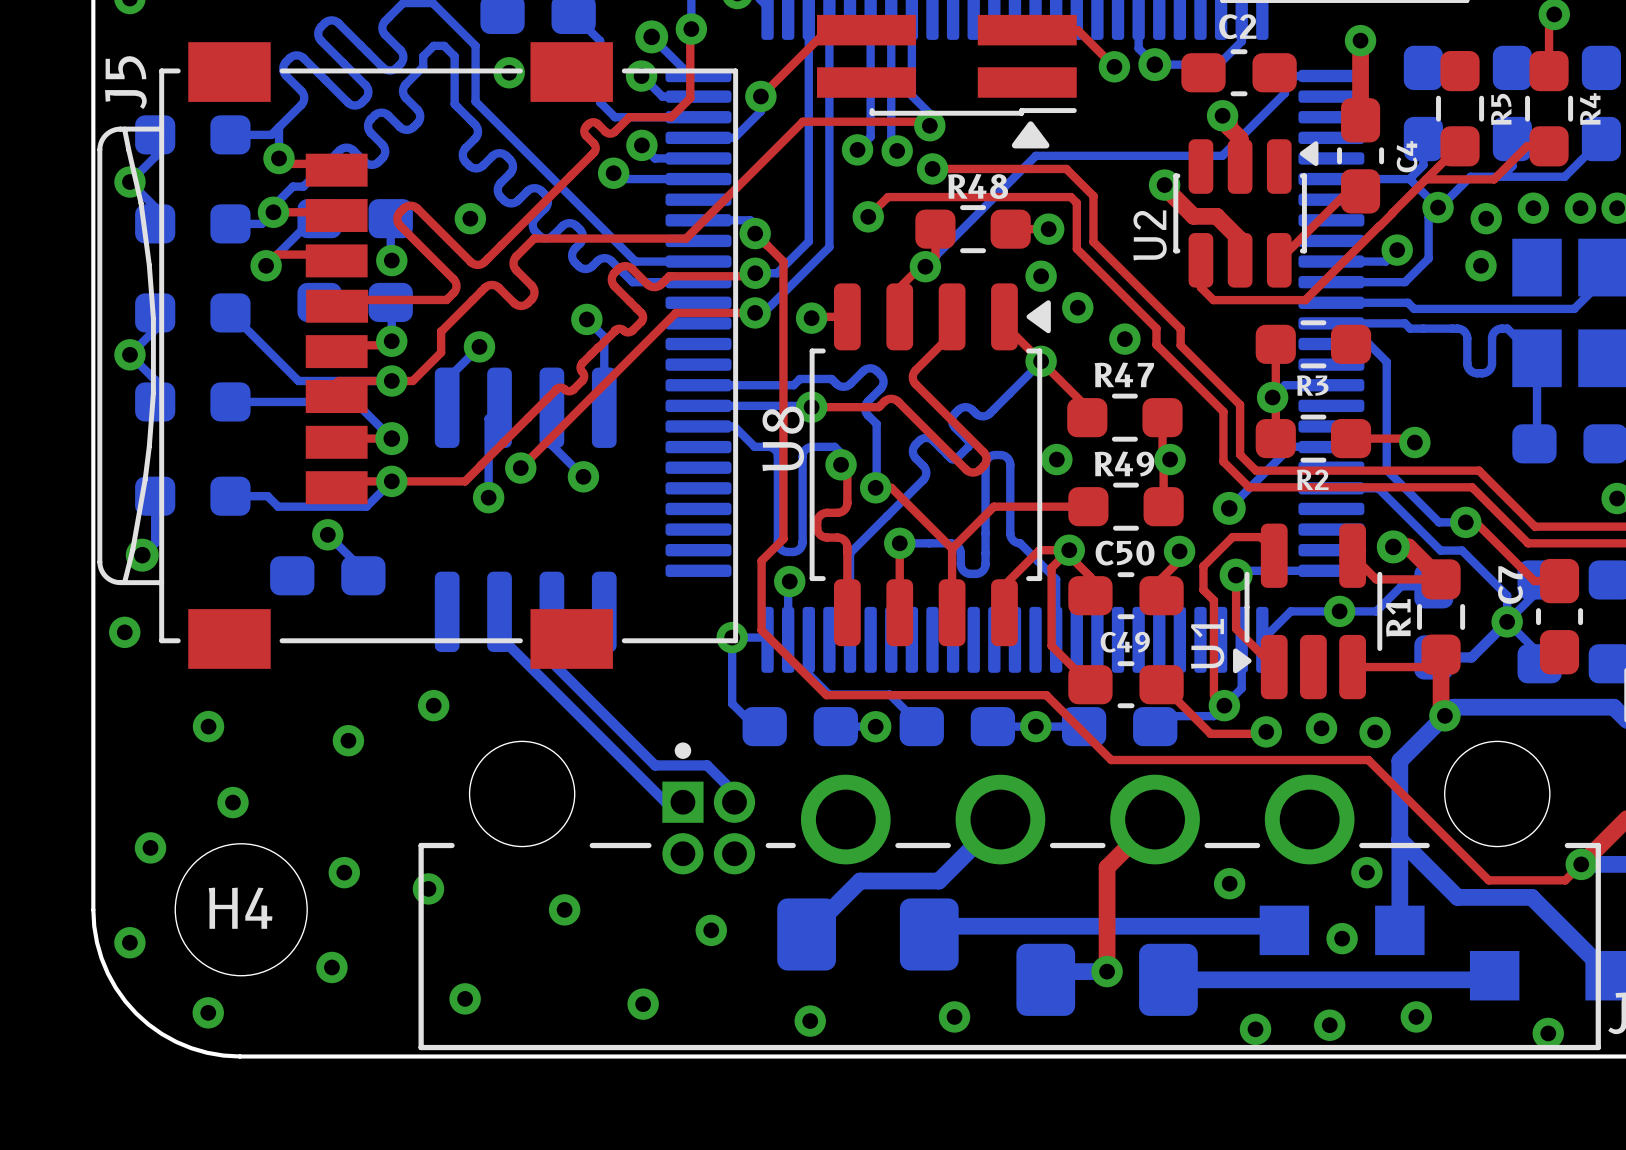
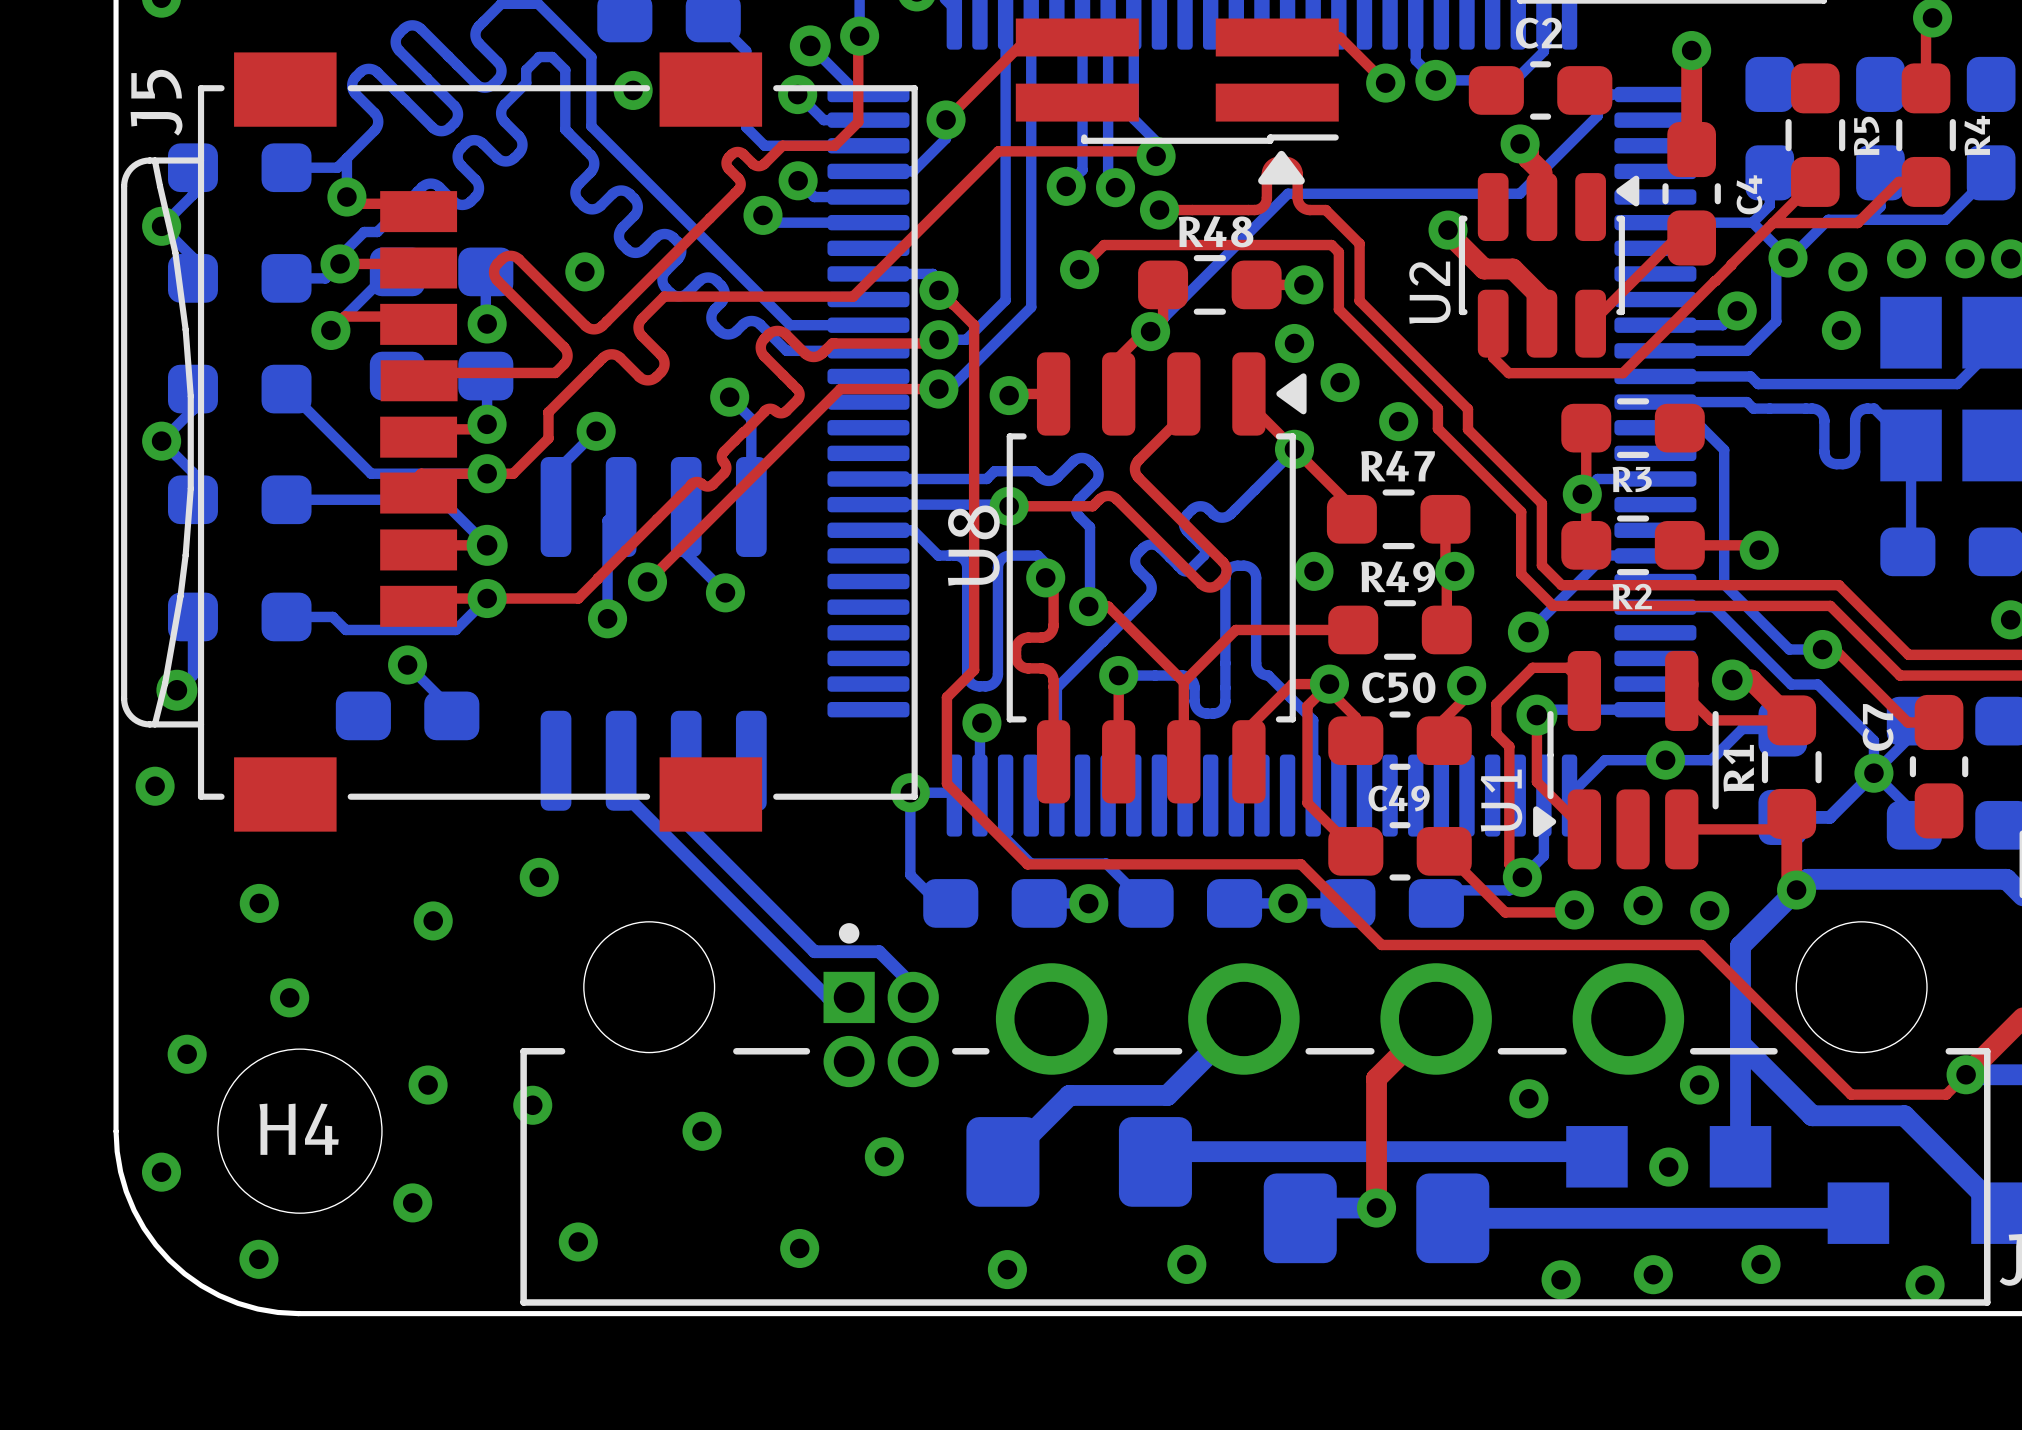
top track: (1009, 168) (1053, 168) -> (1254, 210) (1262, 207) (1266, 201) (1268, 168) (1272, 163) (1279, 161) (1289, 162) (1295, 167) (1298, 201) (1302, 207) (1309, 210)

